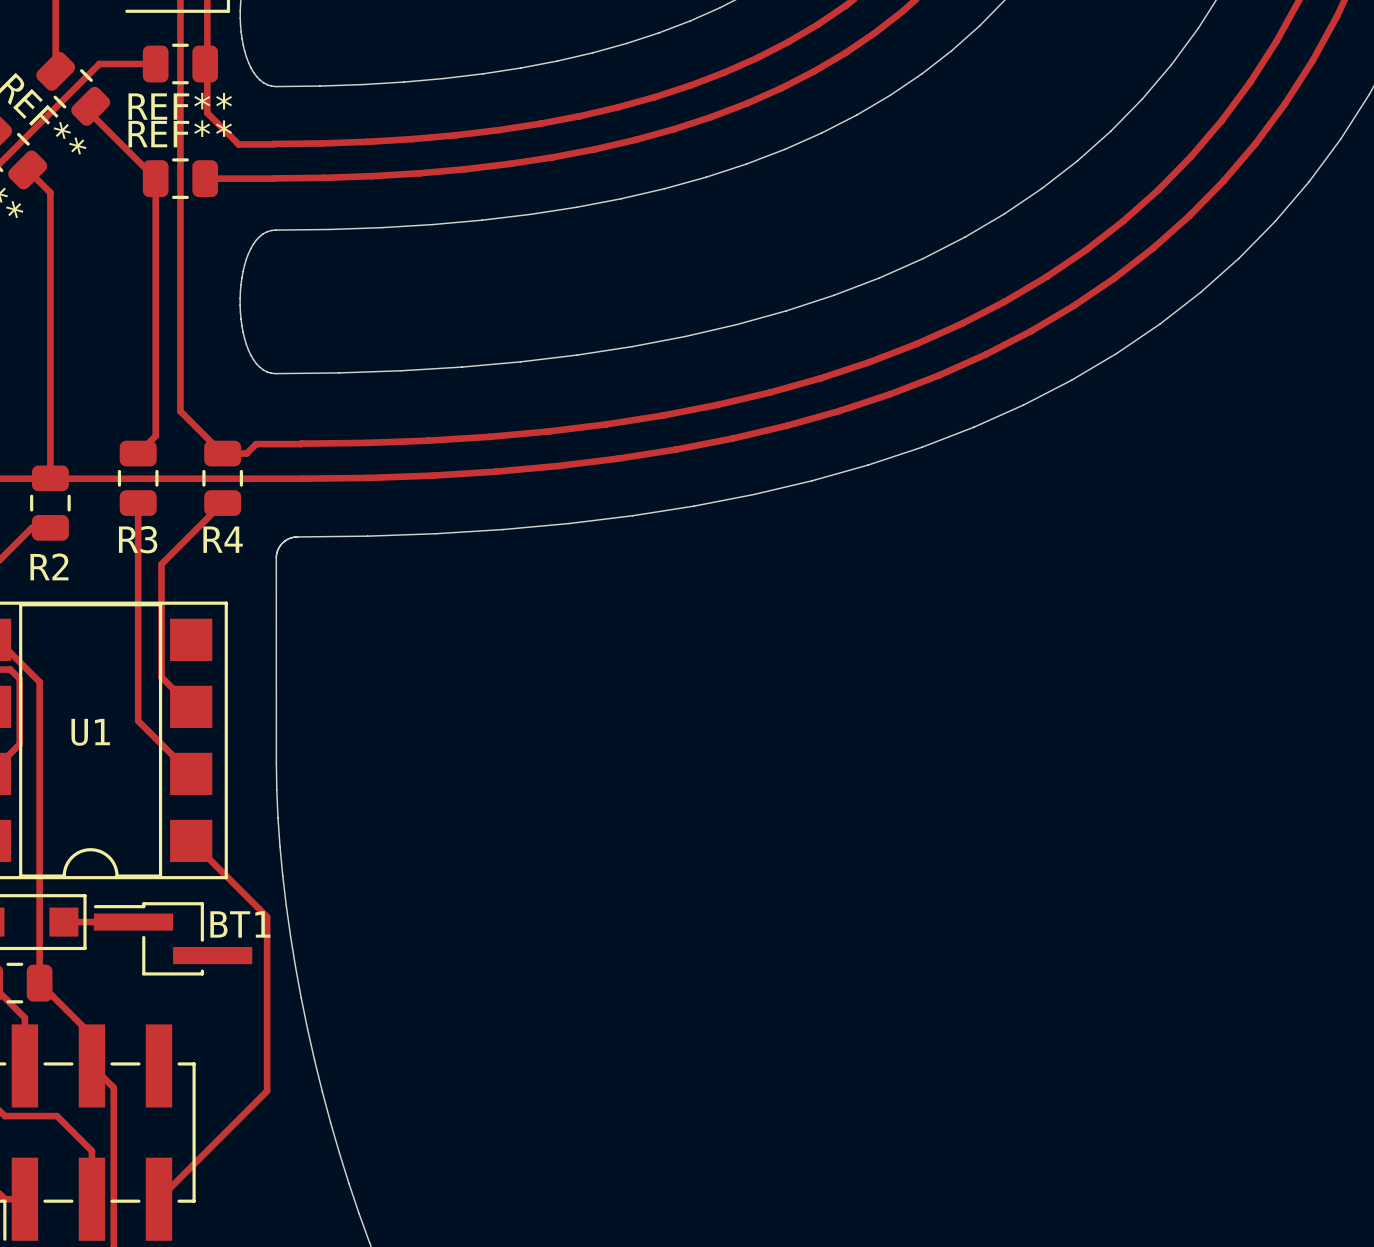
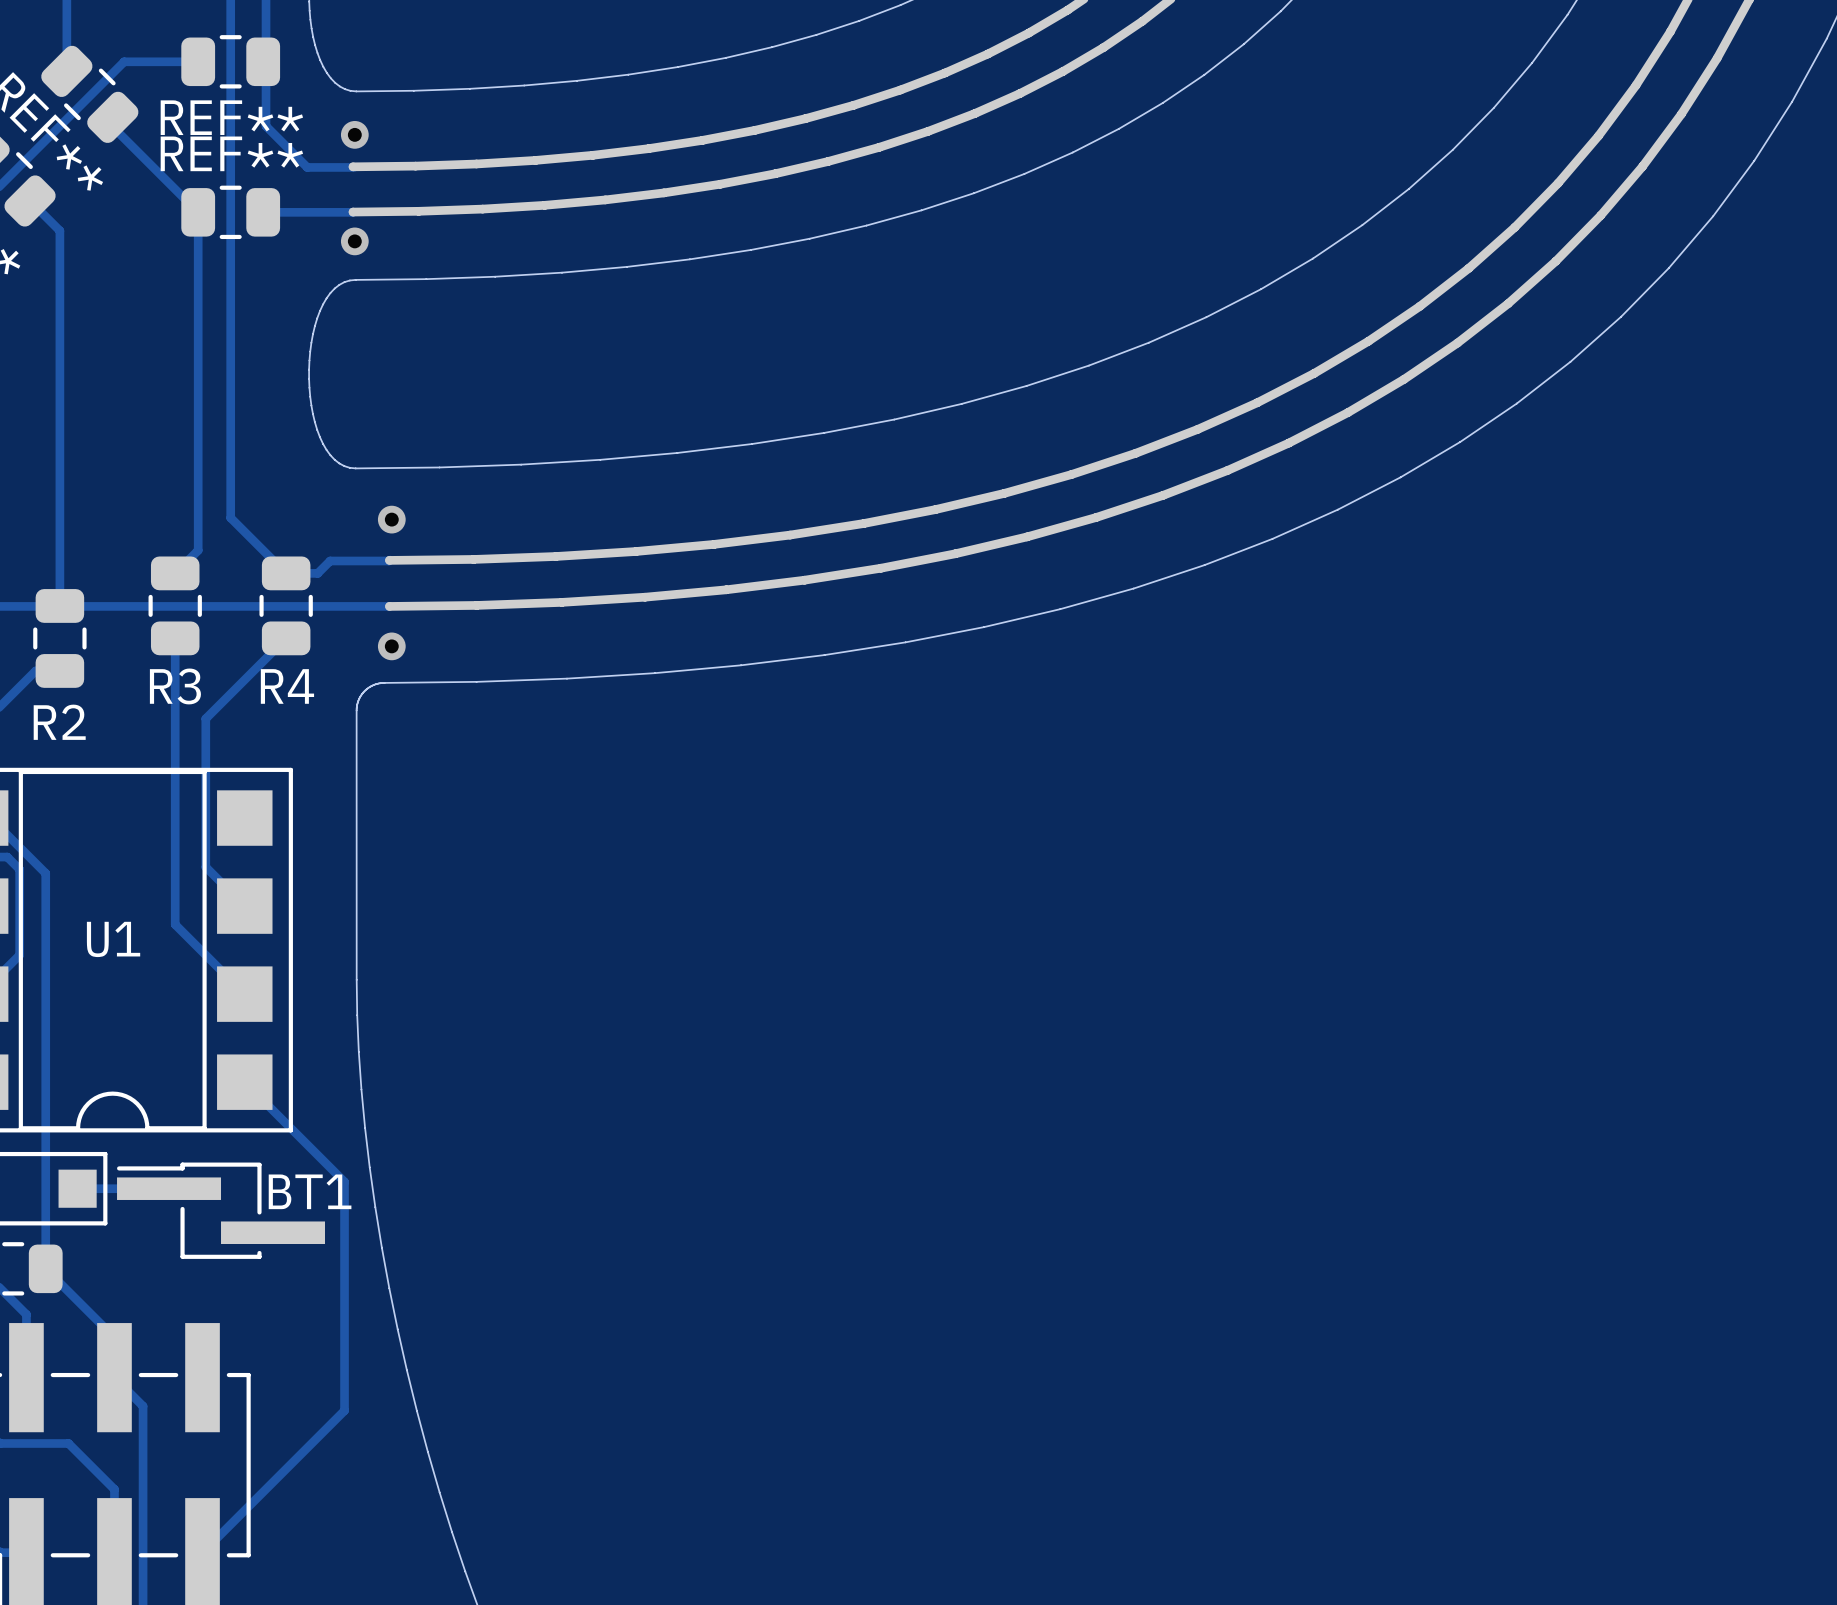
via: none -> (354, 134)
via: none -> (354, 241)
via: none -> (391, 519)
via: none -> (391, 646)

